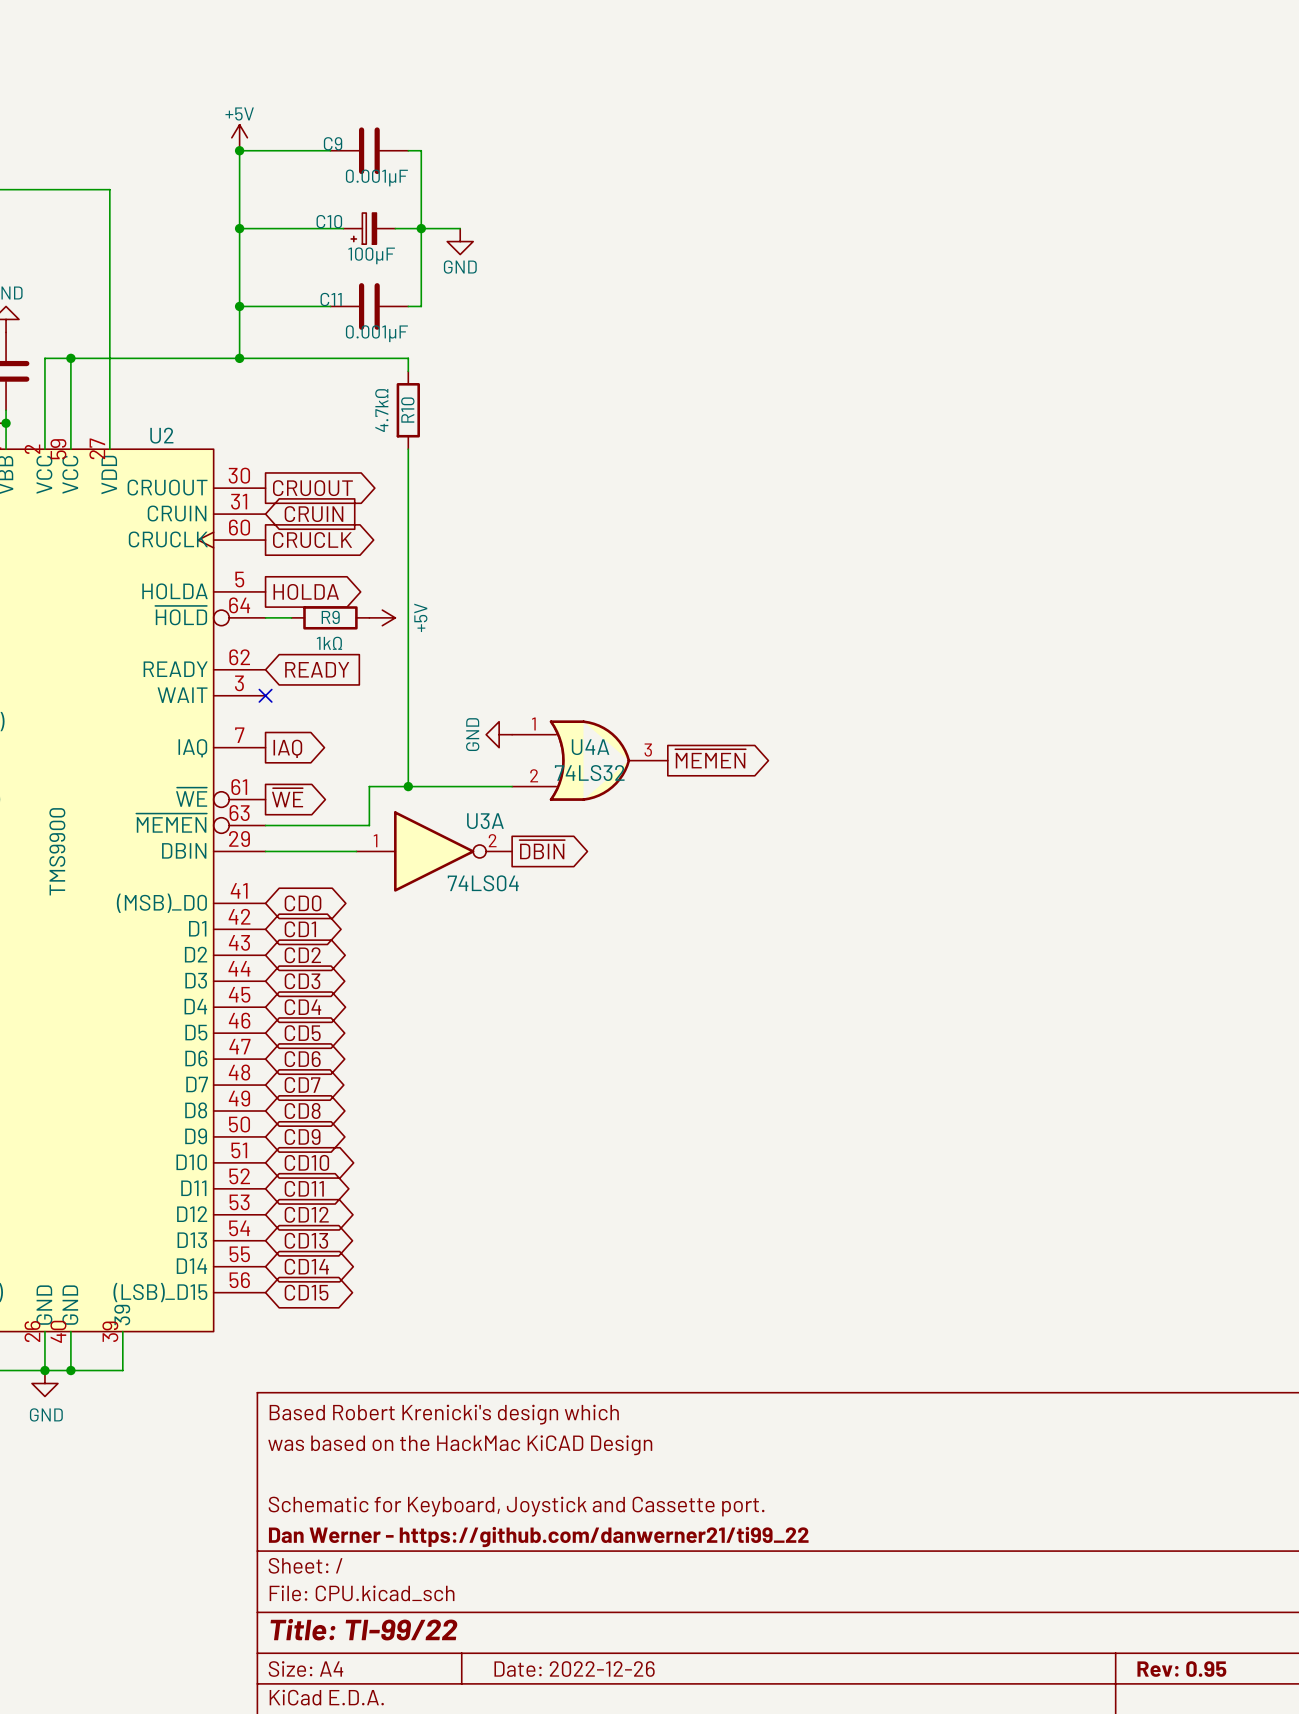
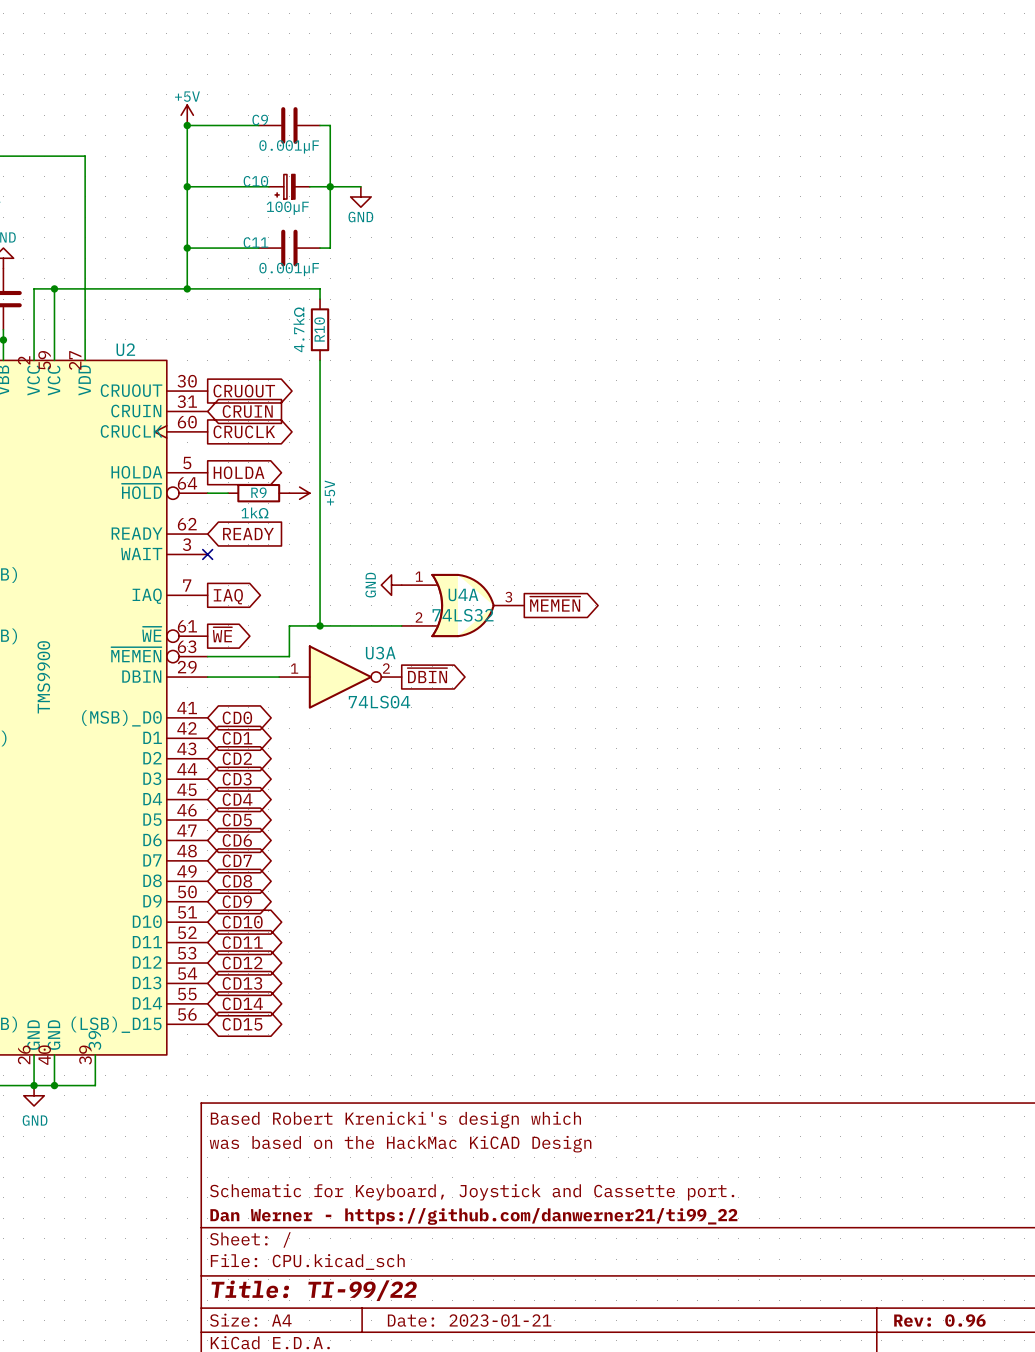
title block: Date: 2022-12-26 (574, 1669) -> Date: 2023-01-21 (469, 1320)
title block: Rev: 0.95 (1181, 1669) -> Rev: 0.96 (939, 1320)

